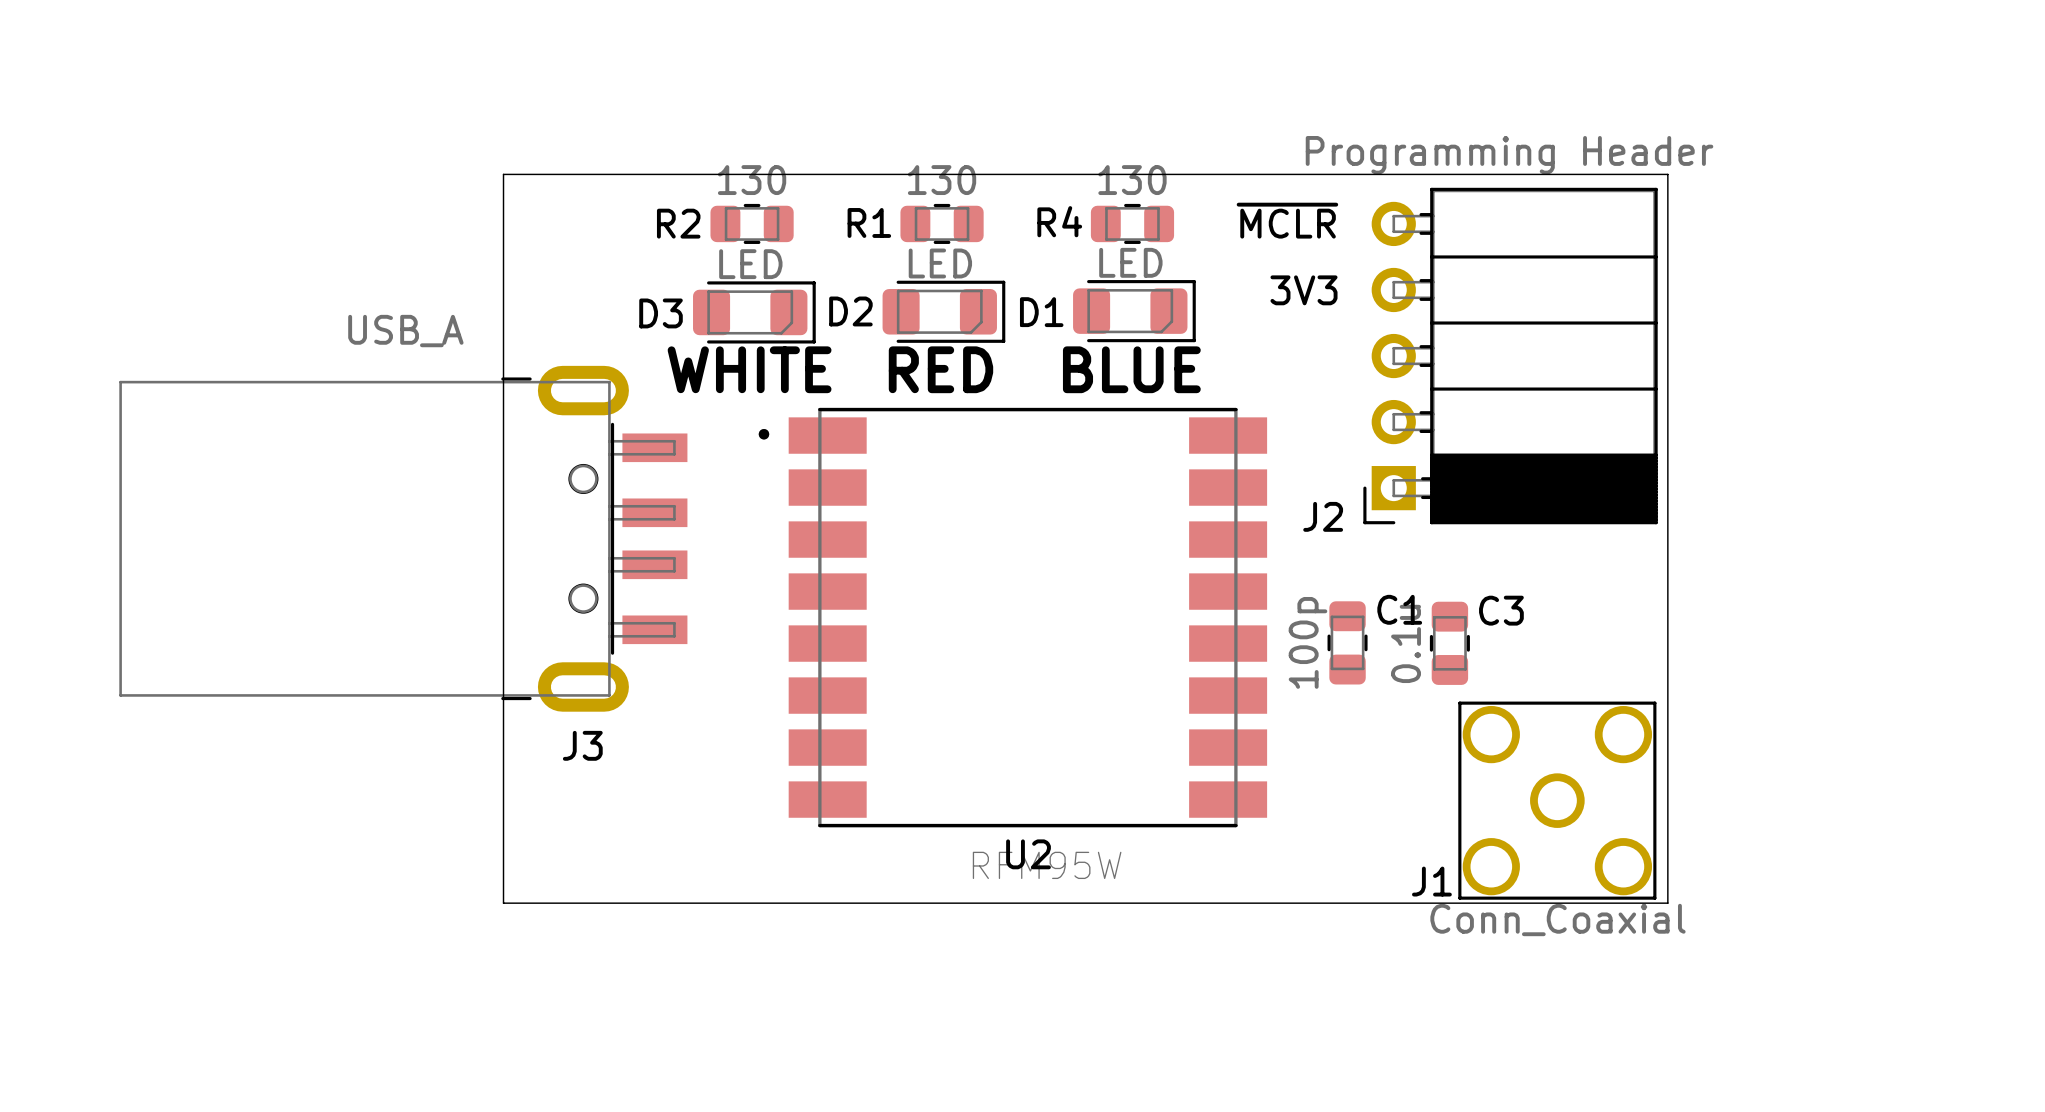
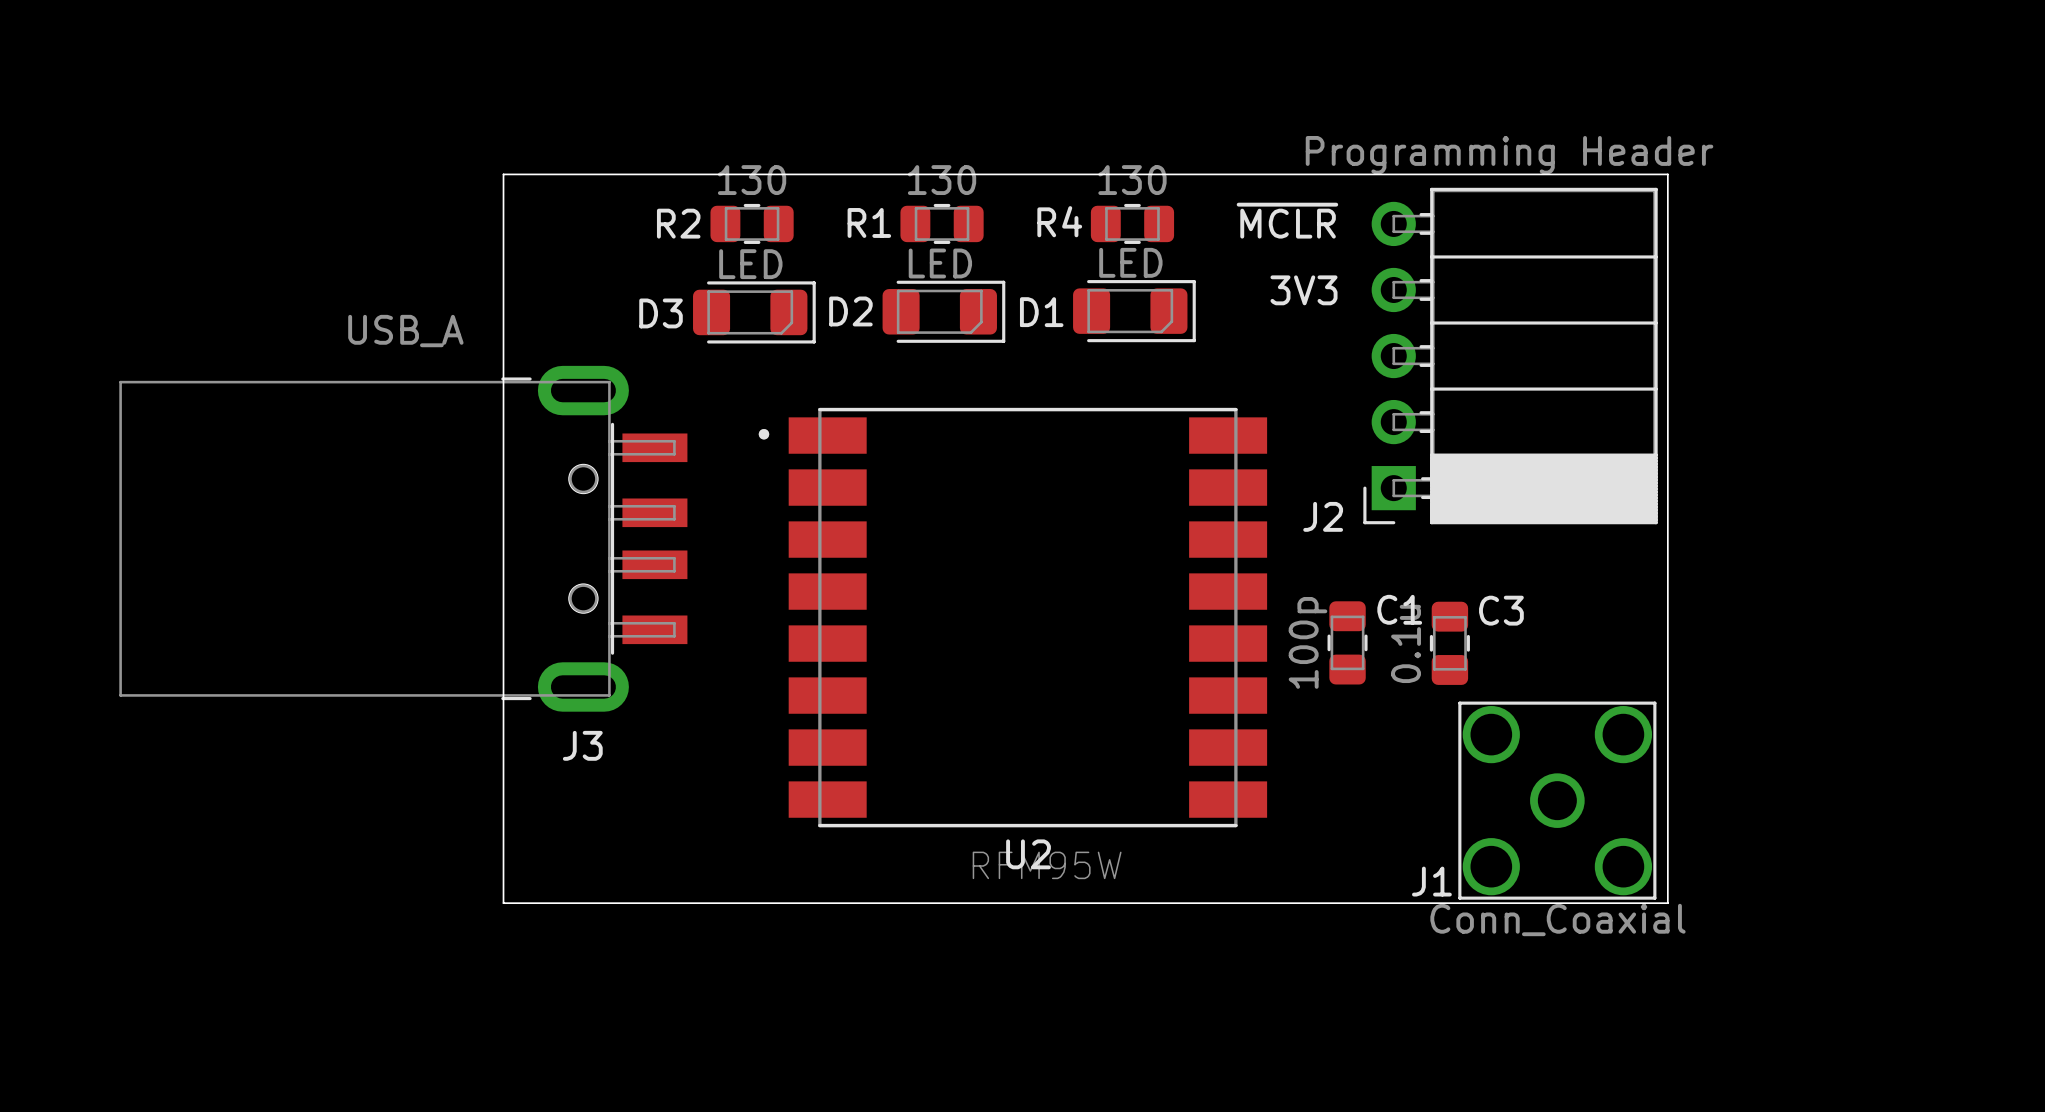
text: WHITE (749, 369) -> none
text: RED (940, 369) -> none
text: BLUE (1131, 369) -> none

